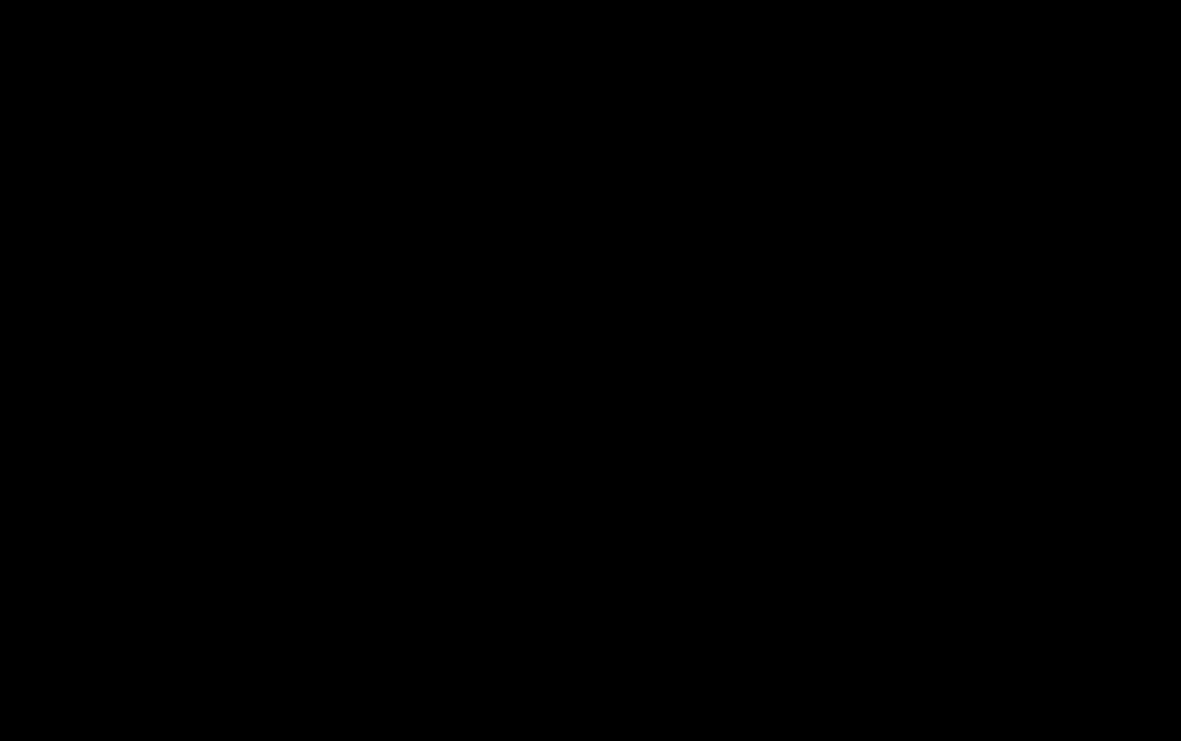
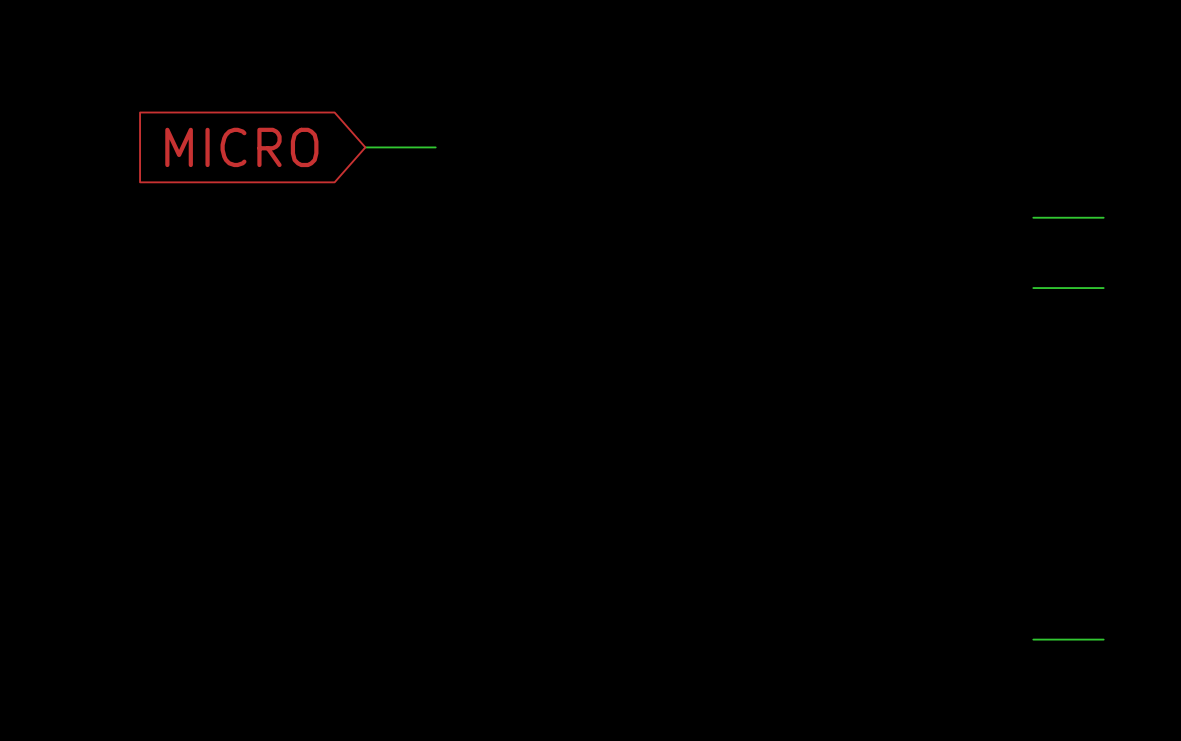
global label: none -> MICRO (241, 147)
wire: none -> (365, 147) (435, 147)
wire: none -> (1033, 217) (1103, 217)
wire: none -> (1033, 288) (1103, 288)
wire: none -> (1033, 639) (1103, 639)

